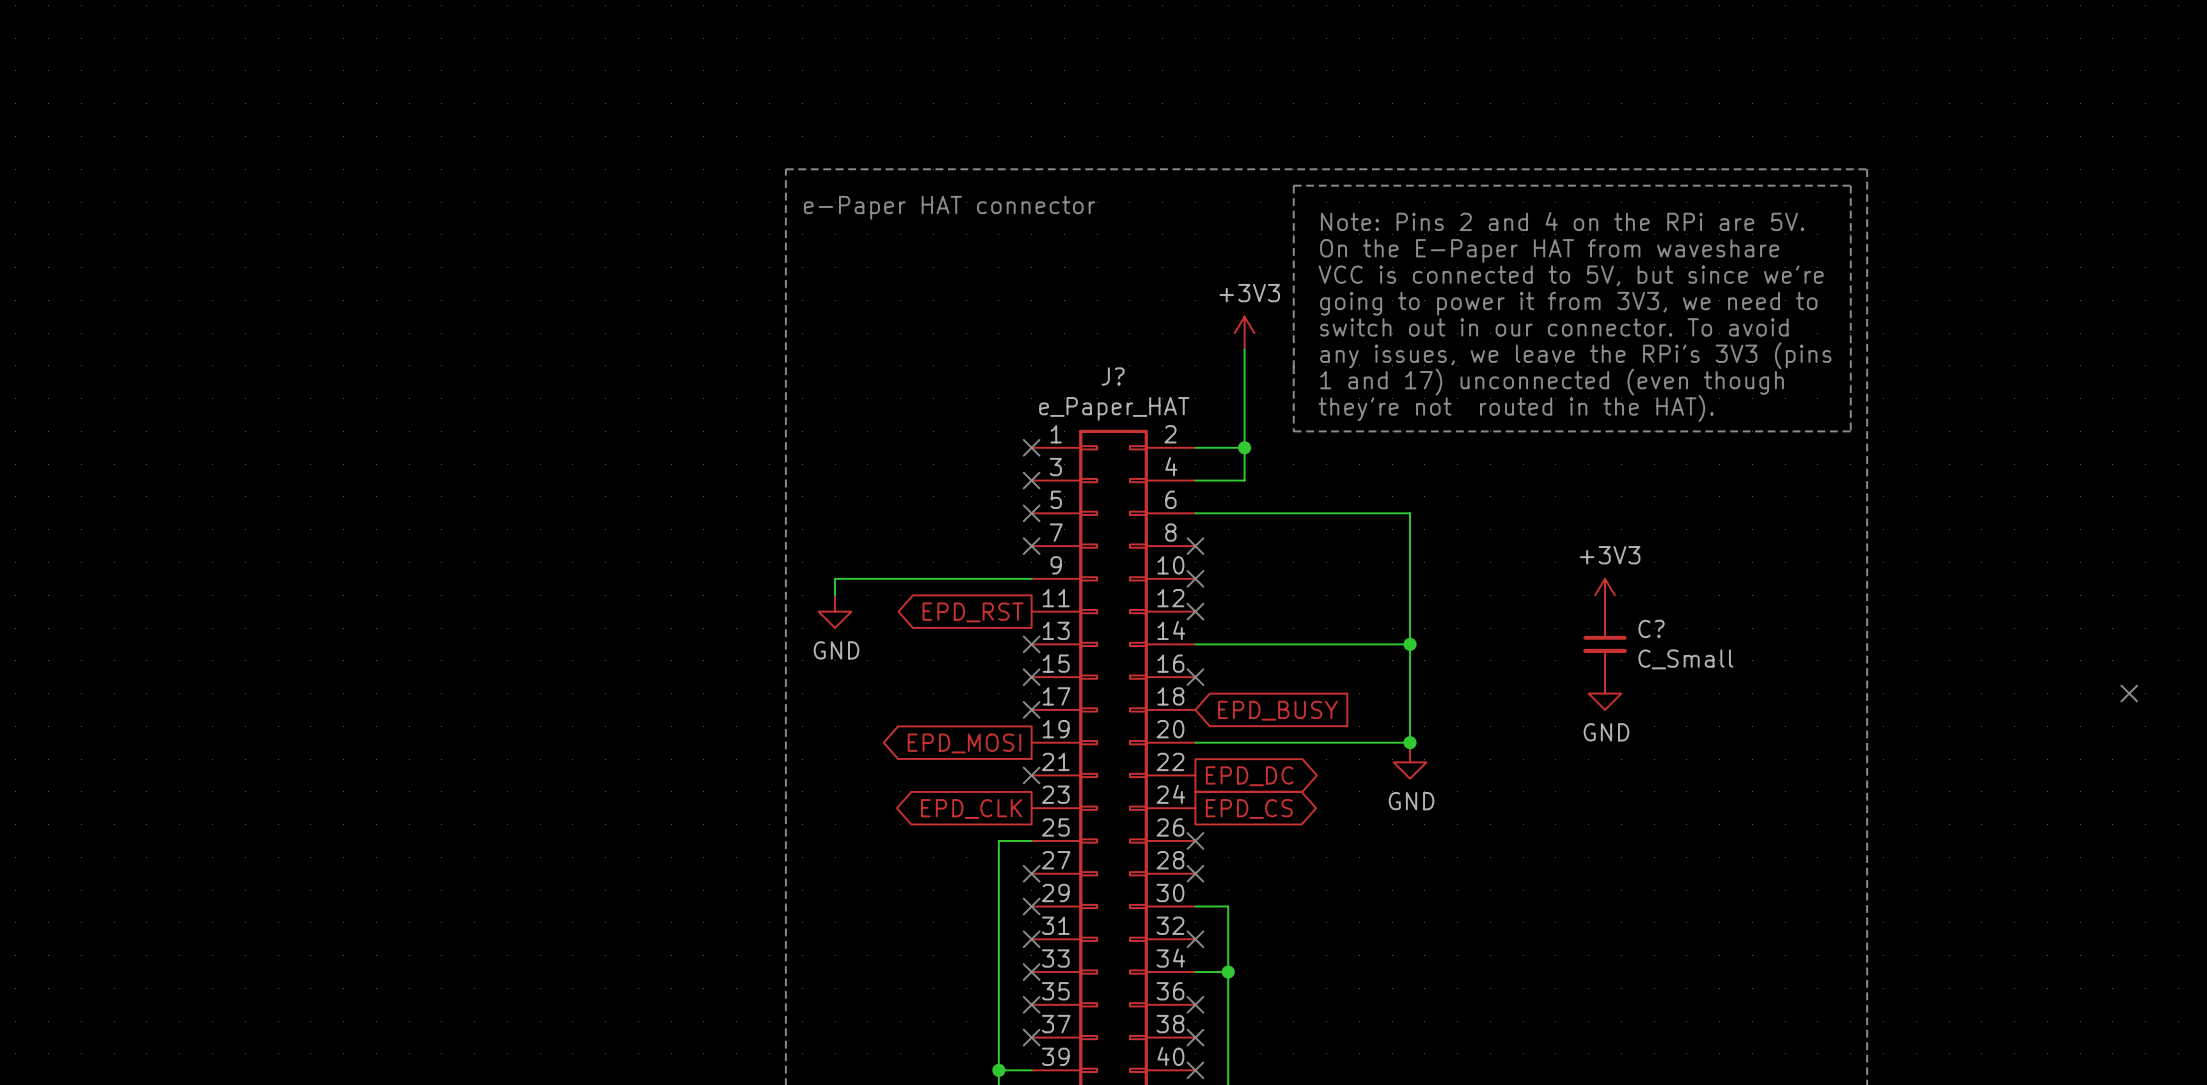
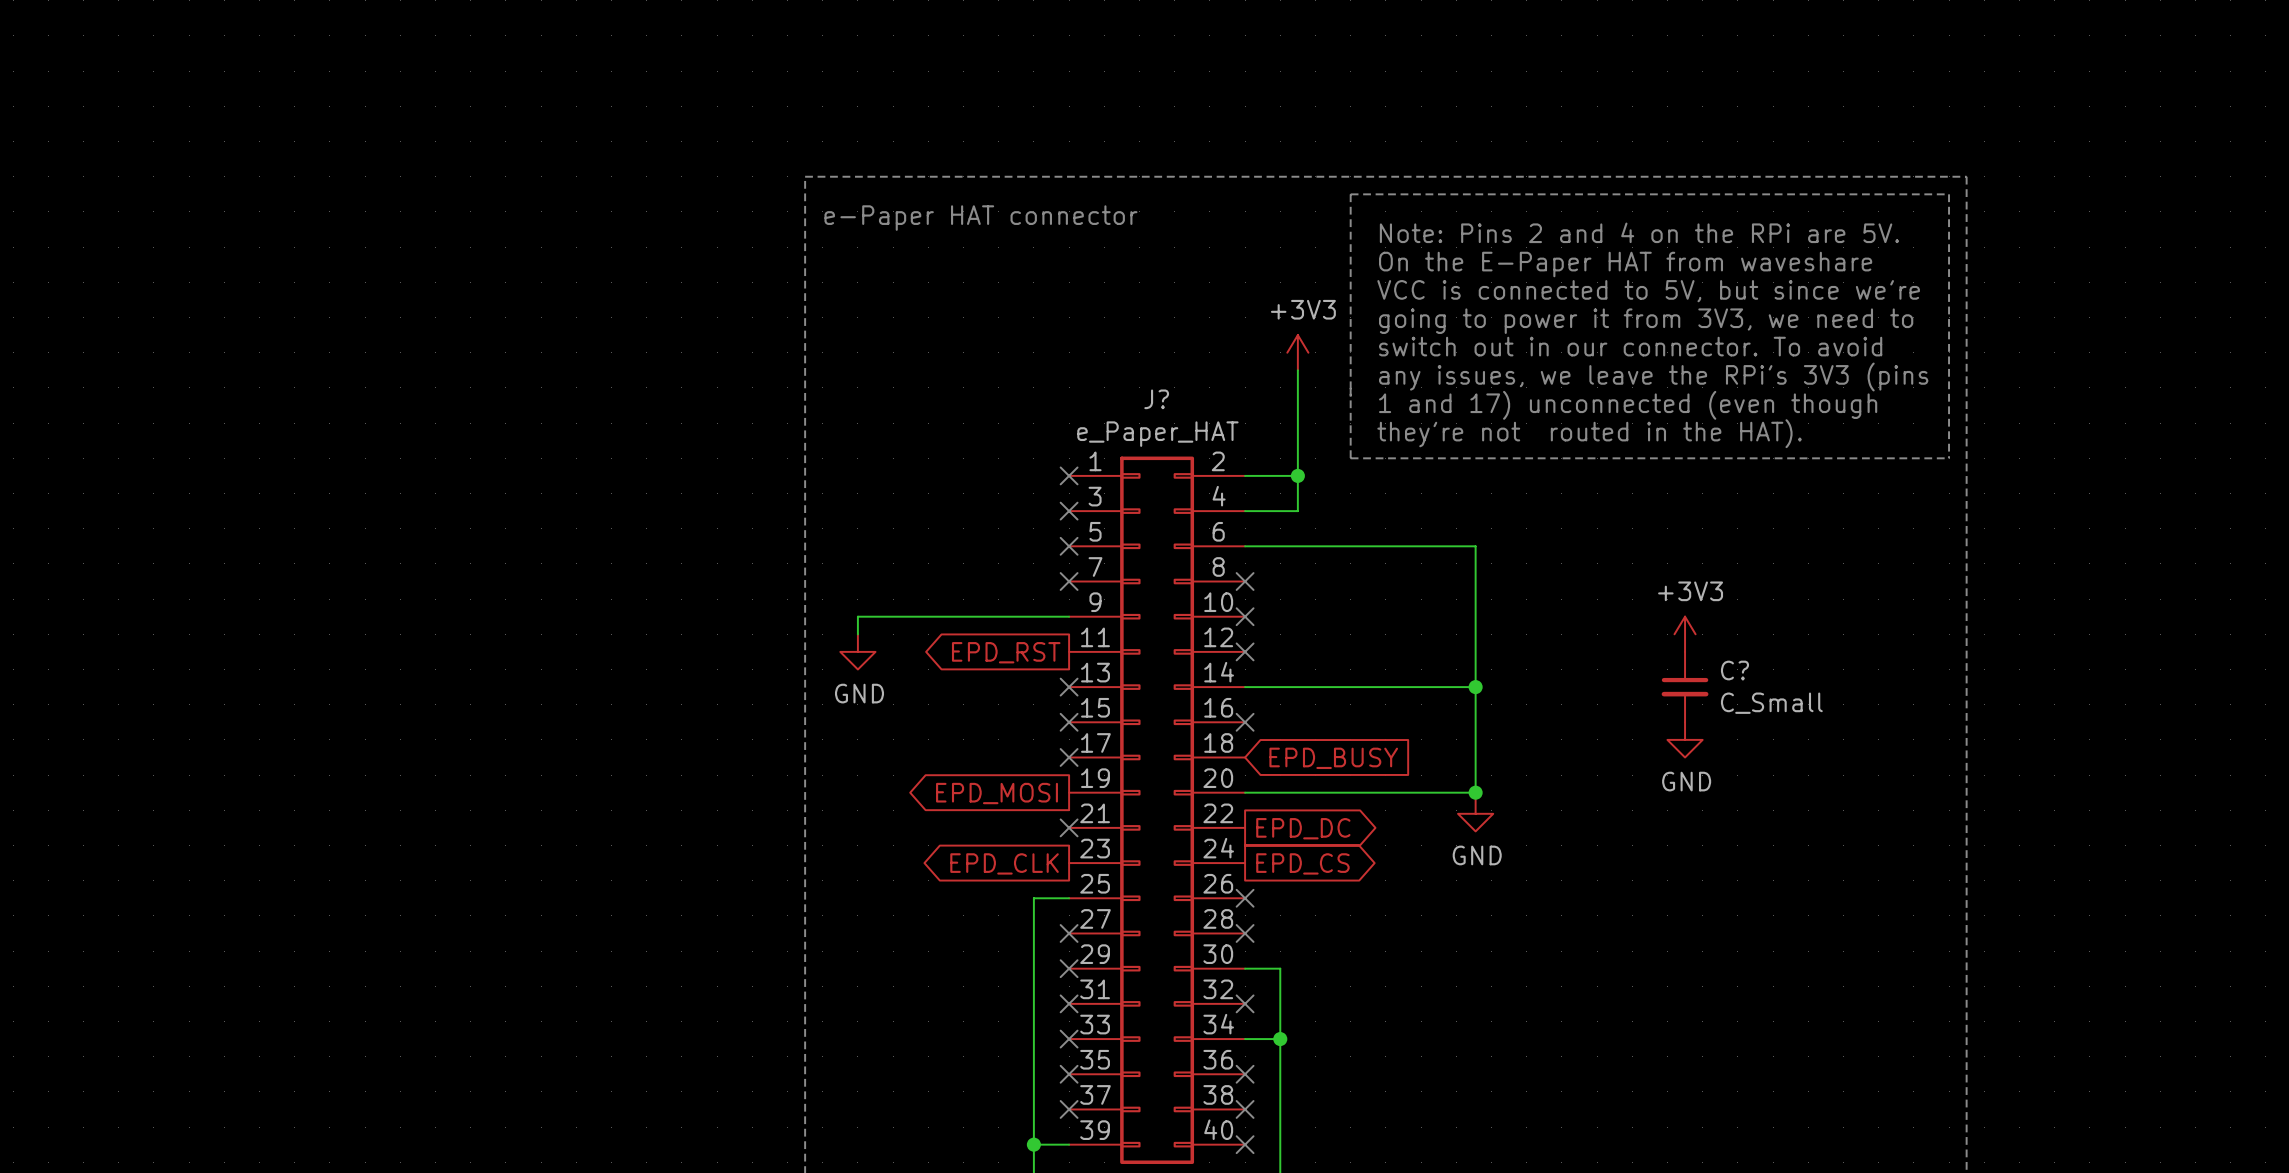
no-connect mark: (2129, 693) -> none

